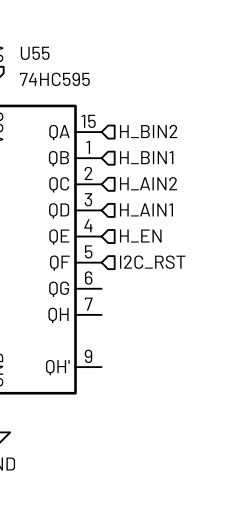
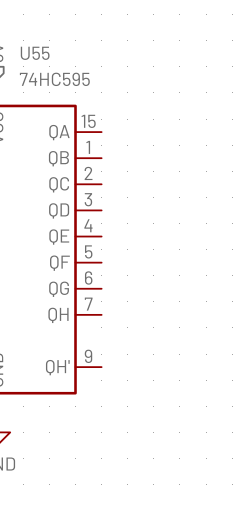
hierarchical label: H_BIN2 (148, 131) -> none
hierarchical label: H_BIN1 (146, 157) -> none
hierarchical label: H_AIN2 (148, 183) -> none
hierarchical label: H_AIN1 (146, 209) -> none
hierarchical label: H_EN (140, 236) -> none
hierarchical label: I2C_RST (152, 262) -> none

